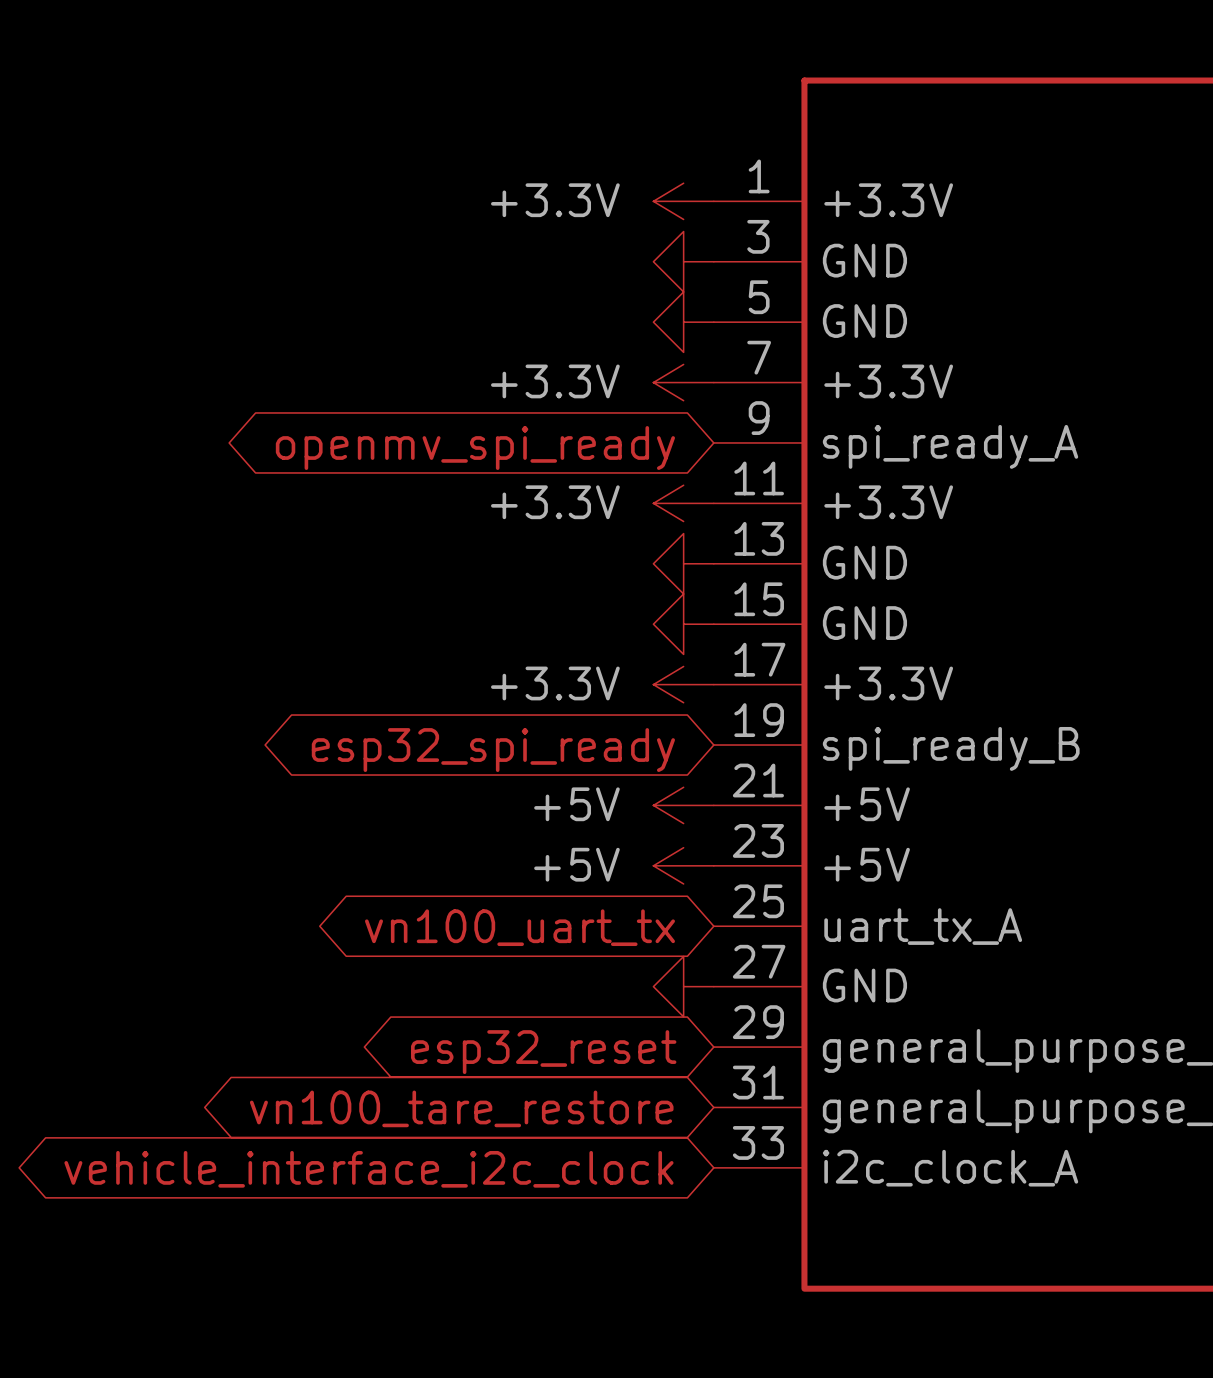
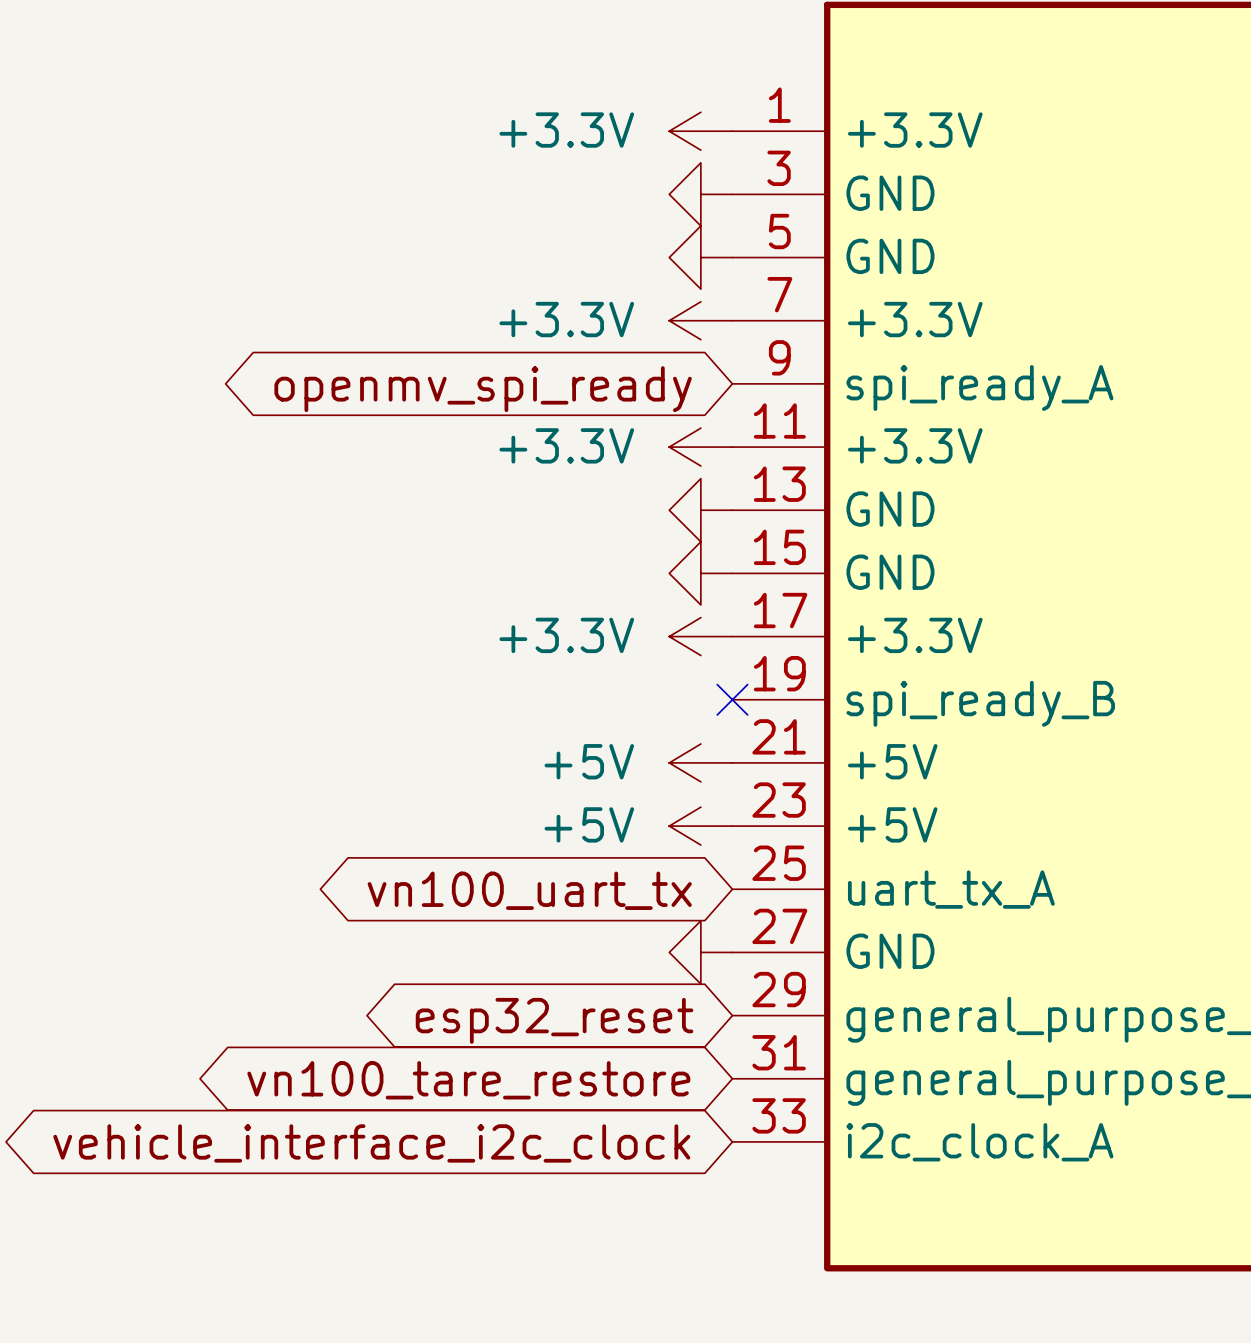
no-connect mark: none -> (732, 699)
global label: esp32_spi_ready (493, 750) -> none

